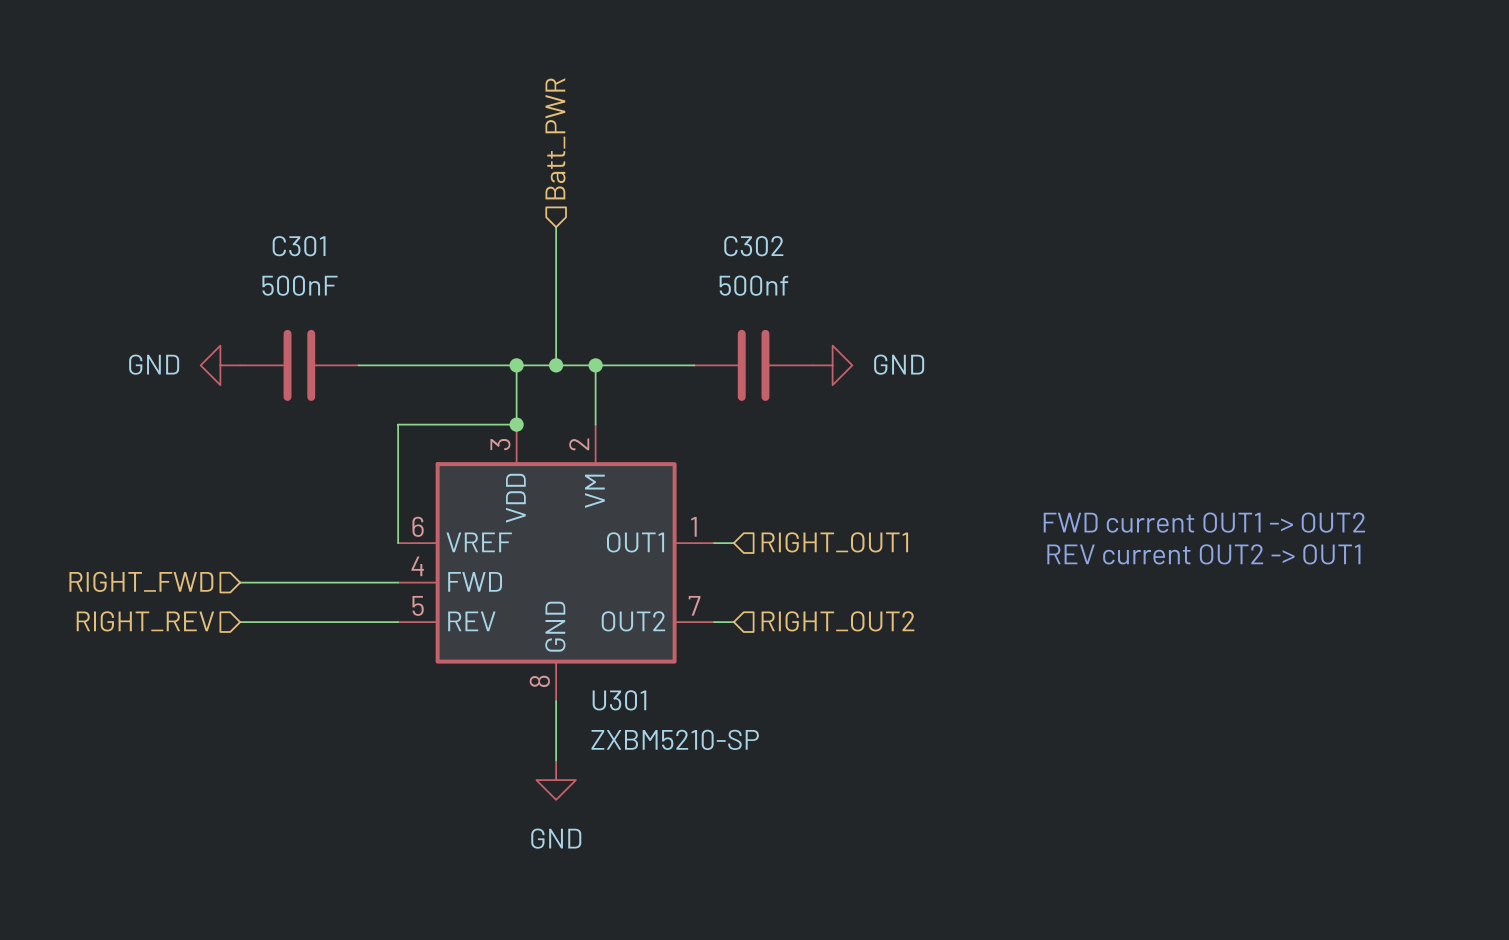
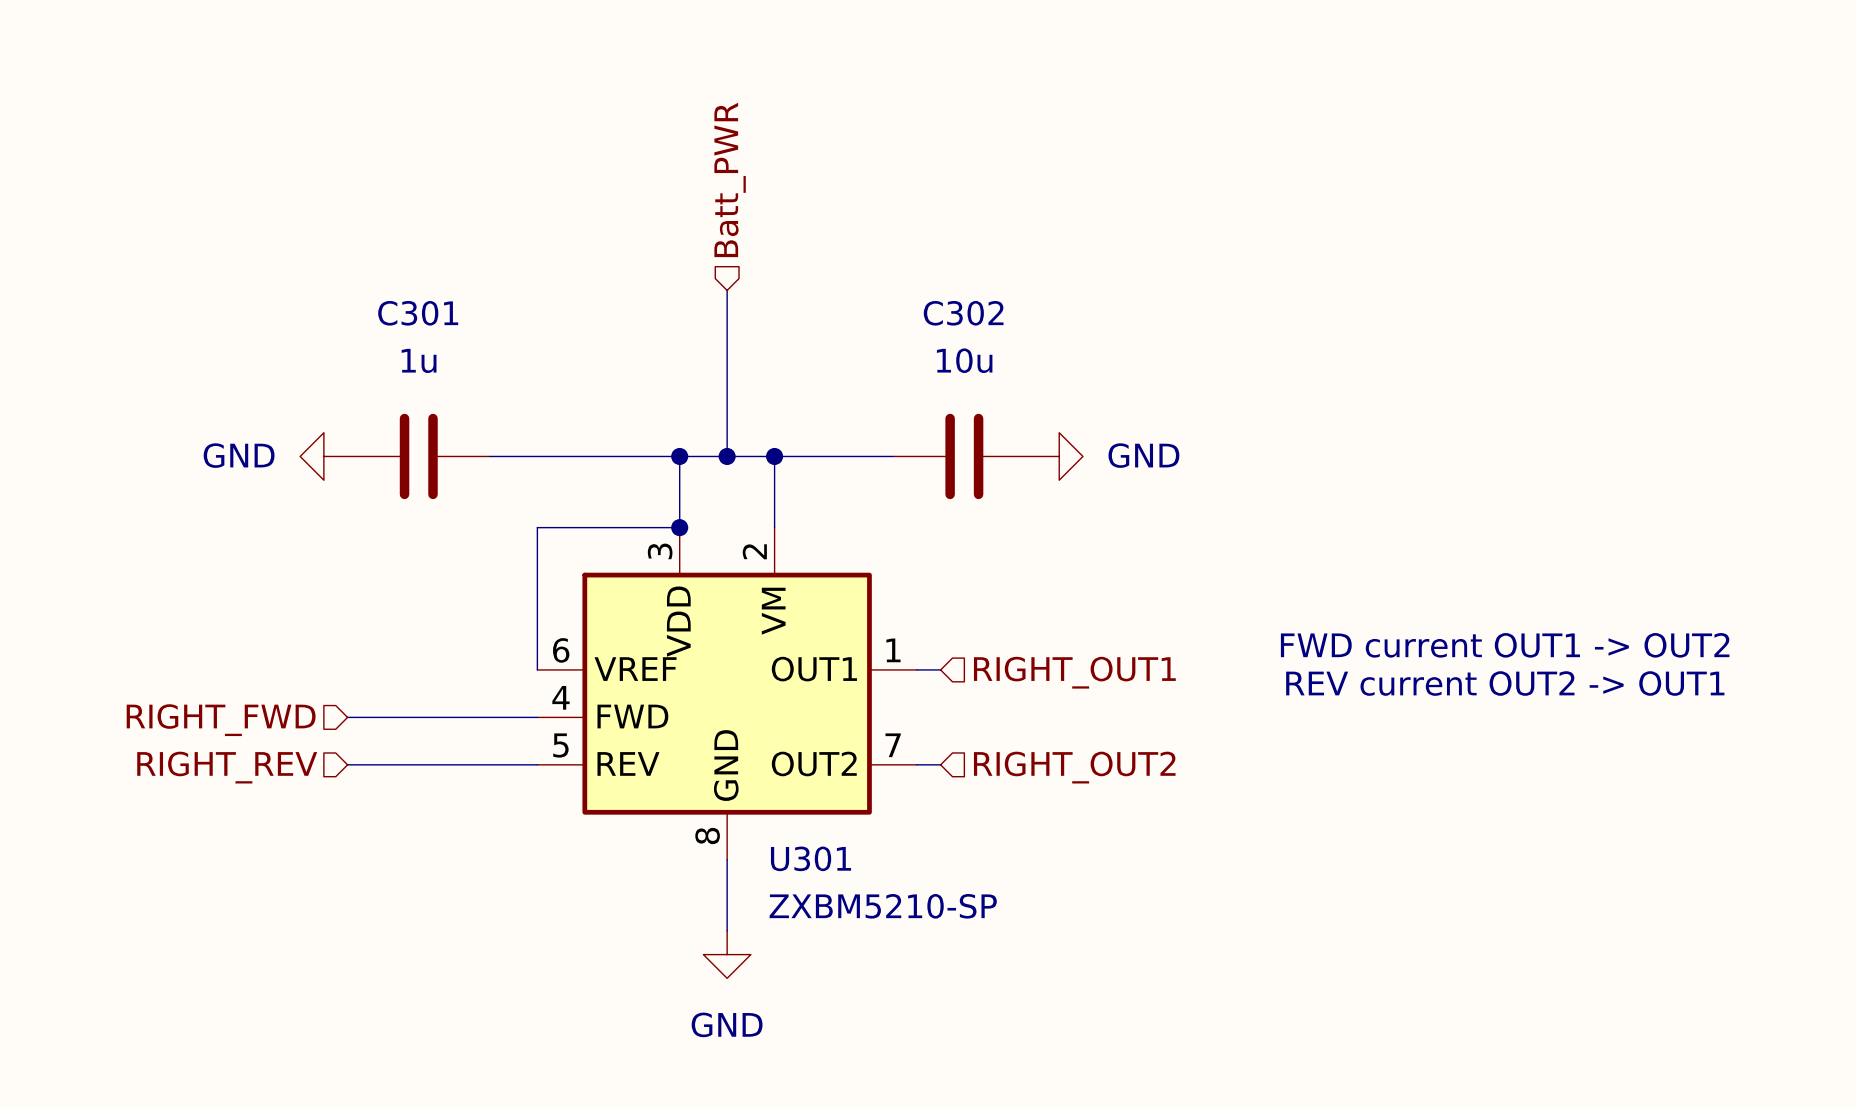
C301 value: 500nF (300, 285) -> 1u (419, 360)
C302 value: 500nf (753, 285) -> 10u (964, 360)

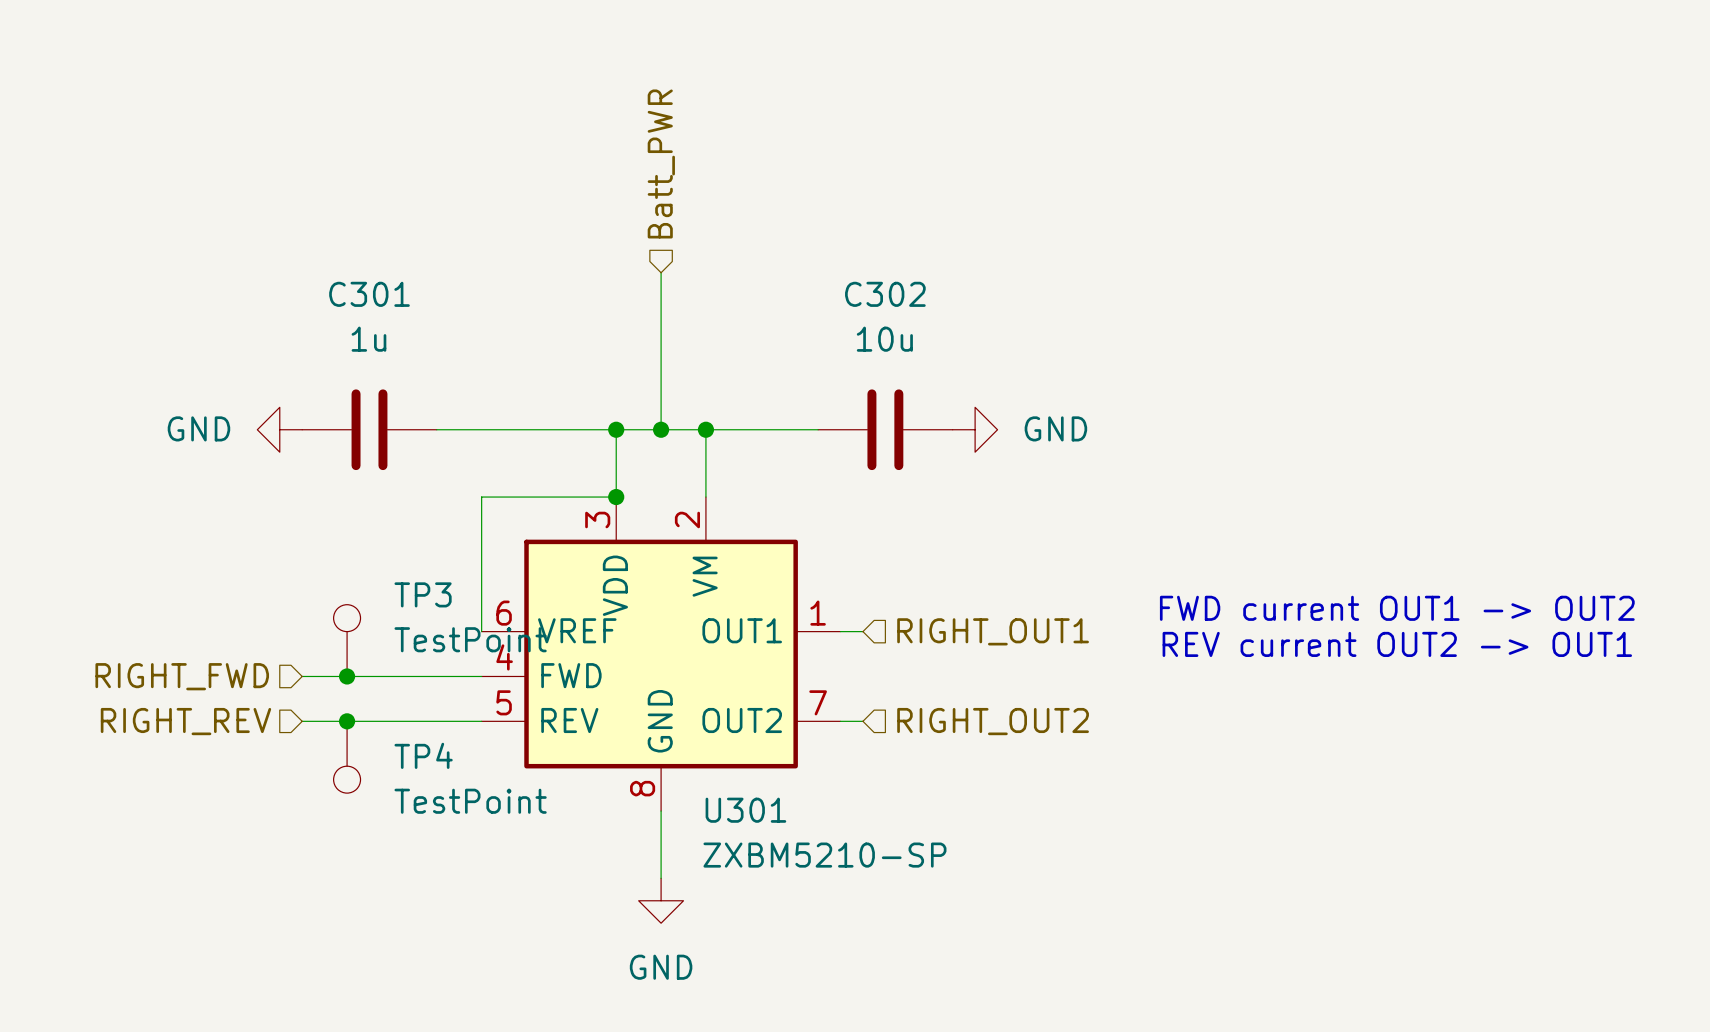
TP3: none -> TestPoint (347, 640)
junction: none -> (347, 676)
junction: none -> (347, 721)
TP4: none -> TestPoint (347, 757)

